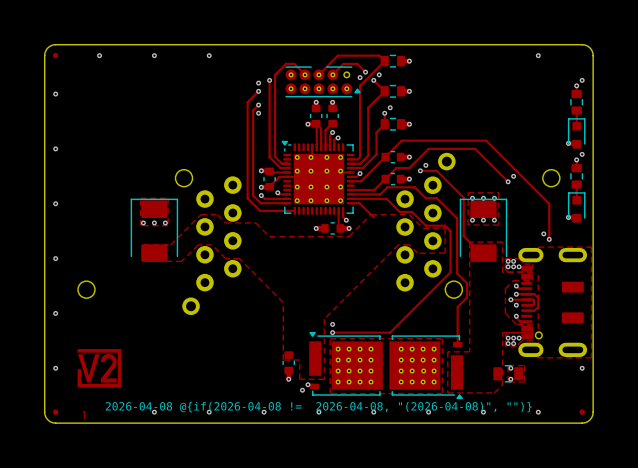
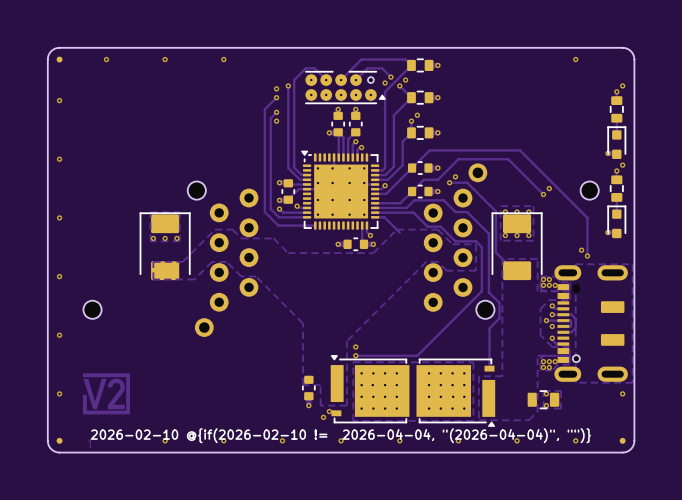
drawing shape: [105, 401, 532, 413] -> [91, 428, 591, 443]

